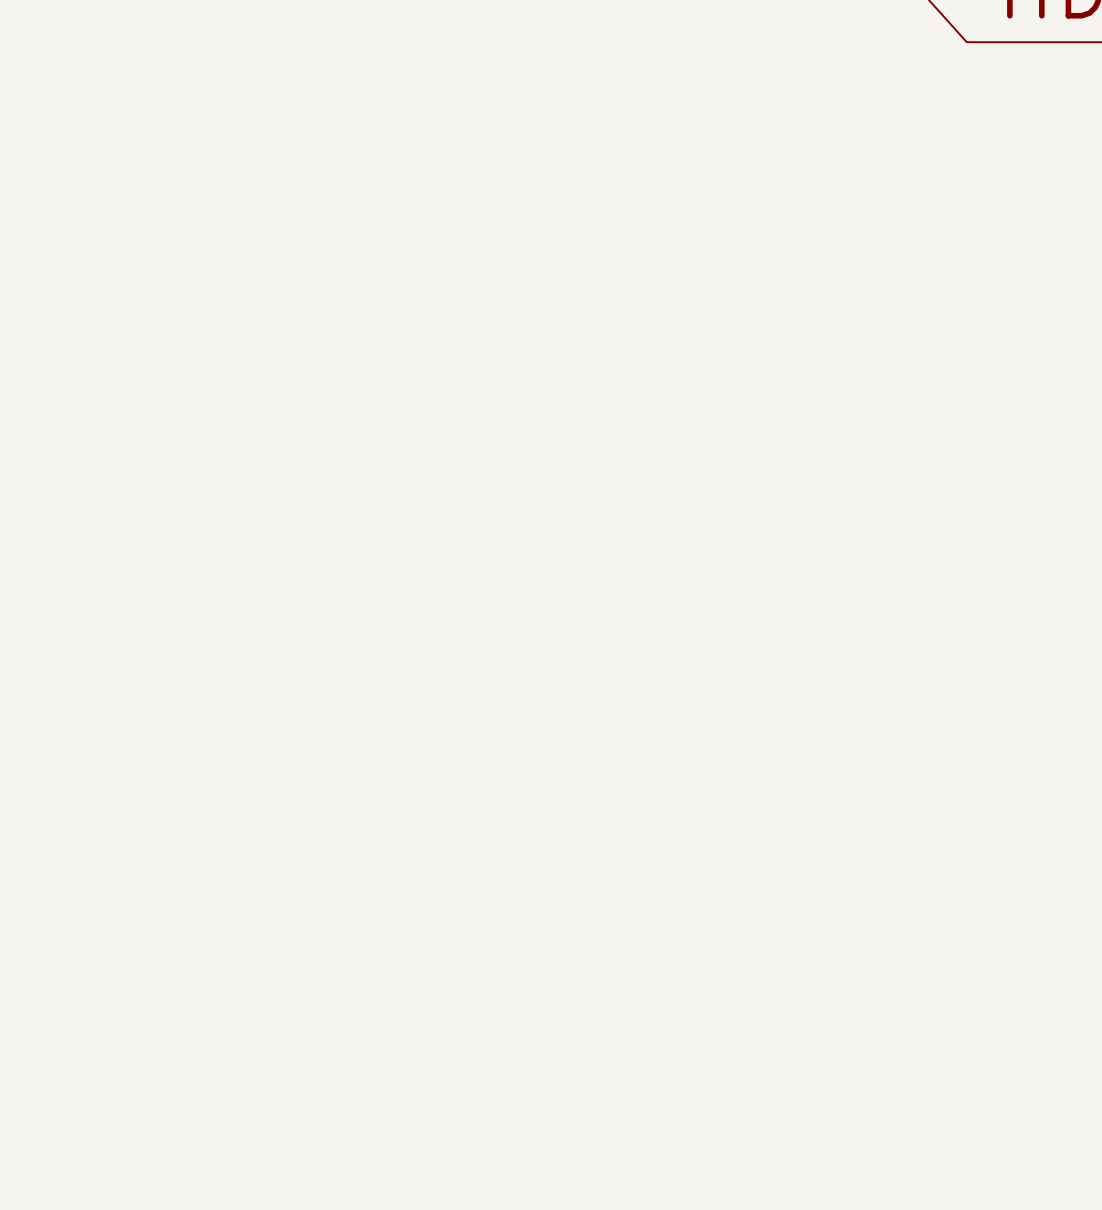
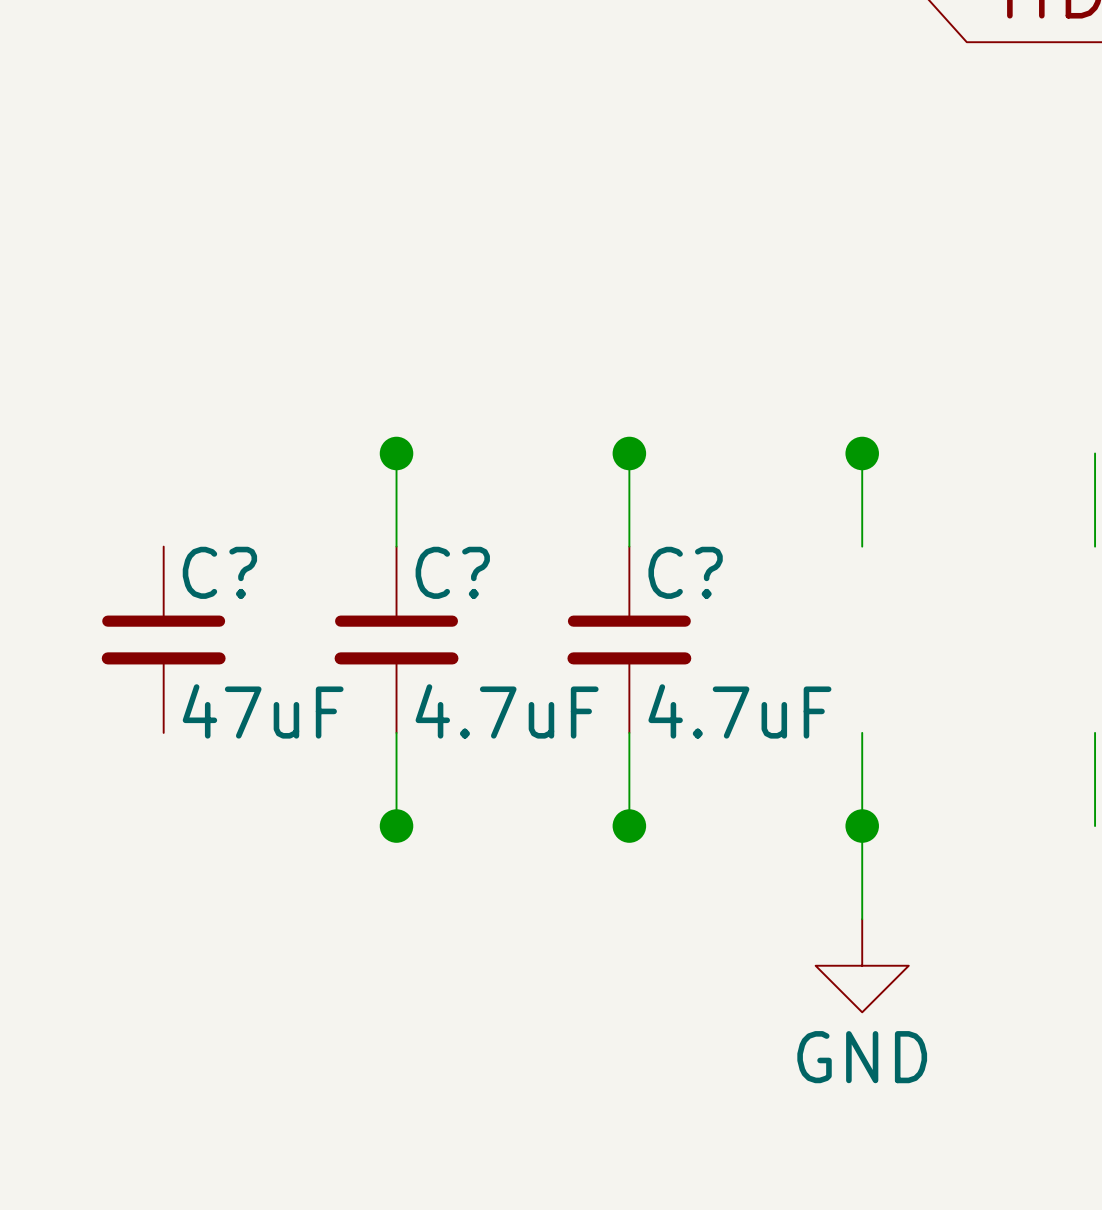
wire: none -> (396, 453) (396, 546)
junction: none -> (396, 453)
wire: none -> (629, 453) (629, 546)
junction: none -> (629, 453)
wire: none -> (862, 453) (862, 546)
junction: none -> (862, 453)
wire: none -> (1095, 453) (1095, 546)
C?: none -> 47uF (163, 639)
C?: none -> 4.7uF (396, 639)
C?: none -> 4.7uF (629, 639)
wire: none -> (396, 732) (396, 826)
wire: none -> (629, 732) (629, 826)
wire: none -> (862, 732) (862, 919)
wire: none -> (1095, 732) (1095, 826)
junction: none -> (396, 826)
junction: none -> (629, 826)
junction: none -> (862, 826)
power symbol: none -> GND (862, 965)

